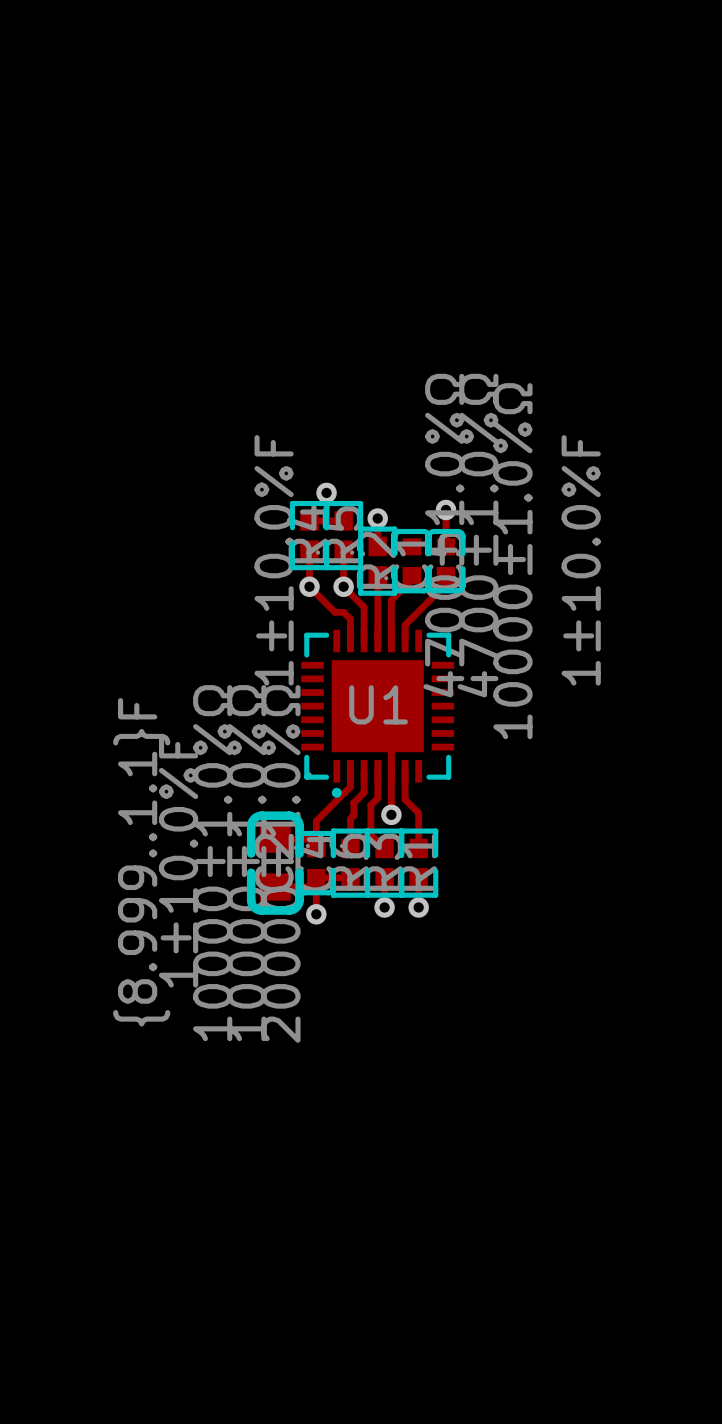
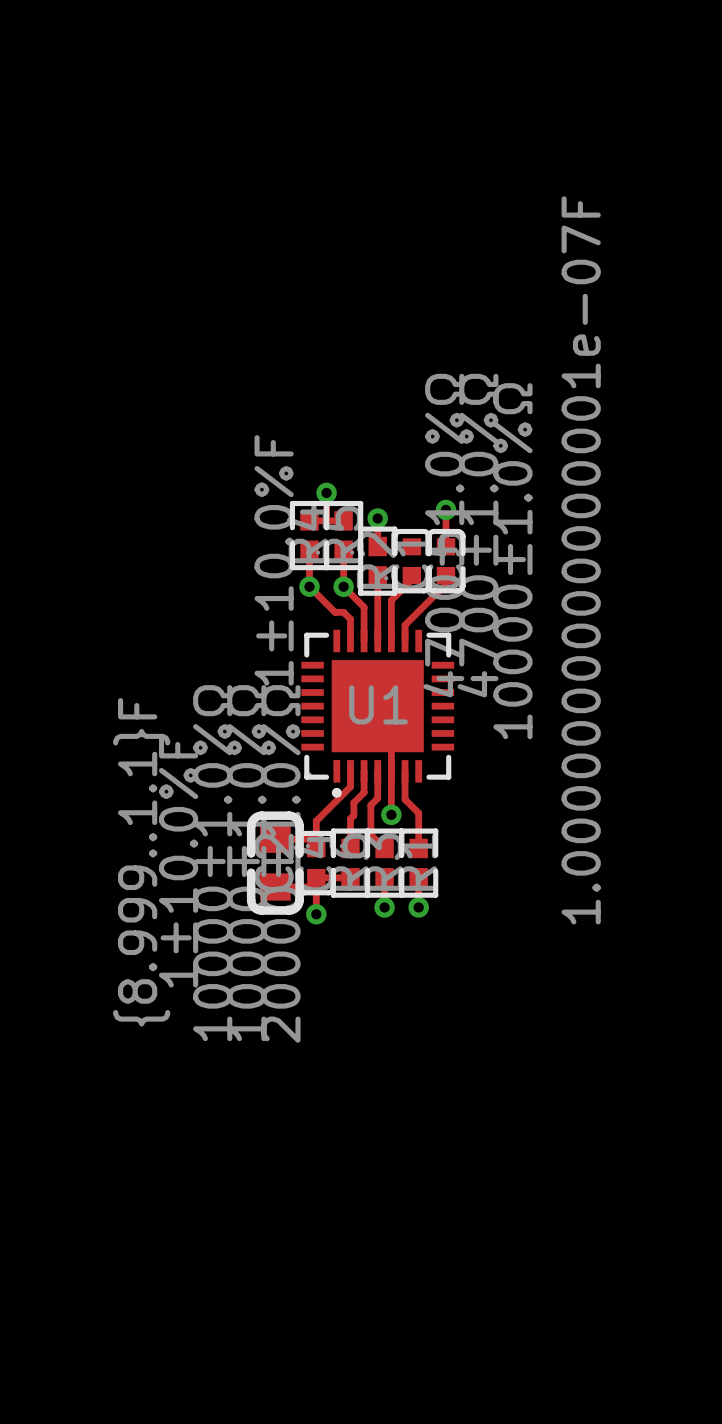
part value: 1±10.0%F (581, 560) -> 1.0000000000000001e-07F (581, 560)

